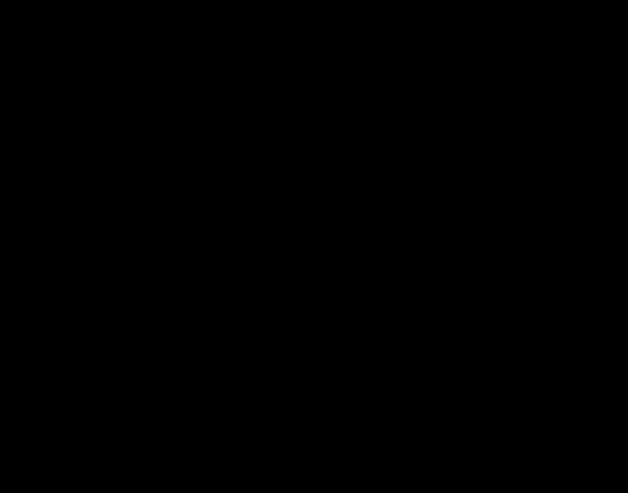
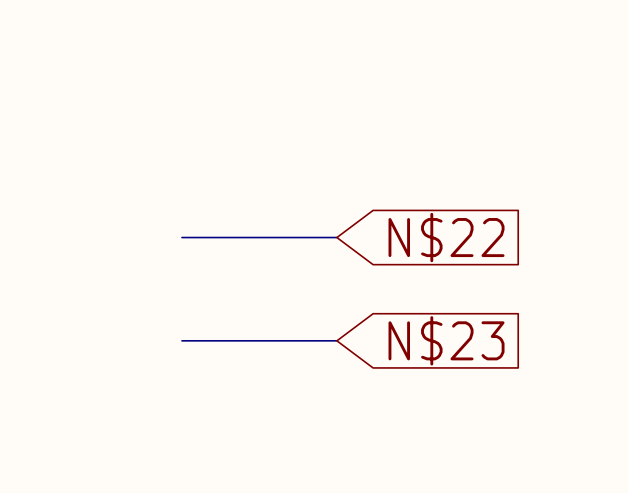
wire: none -> (181, 237) (336, 237)
global label: none -> N$22 (446, 237)
wire: none -> (181, 340) (336, 340)
global label: none -> N$23 (446, 340)

